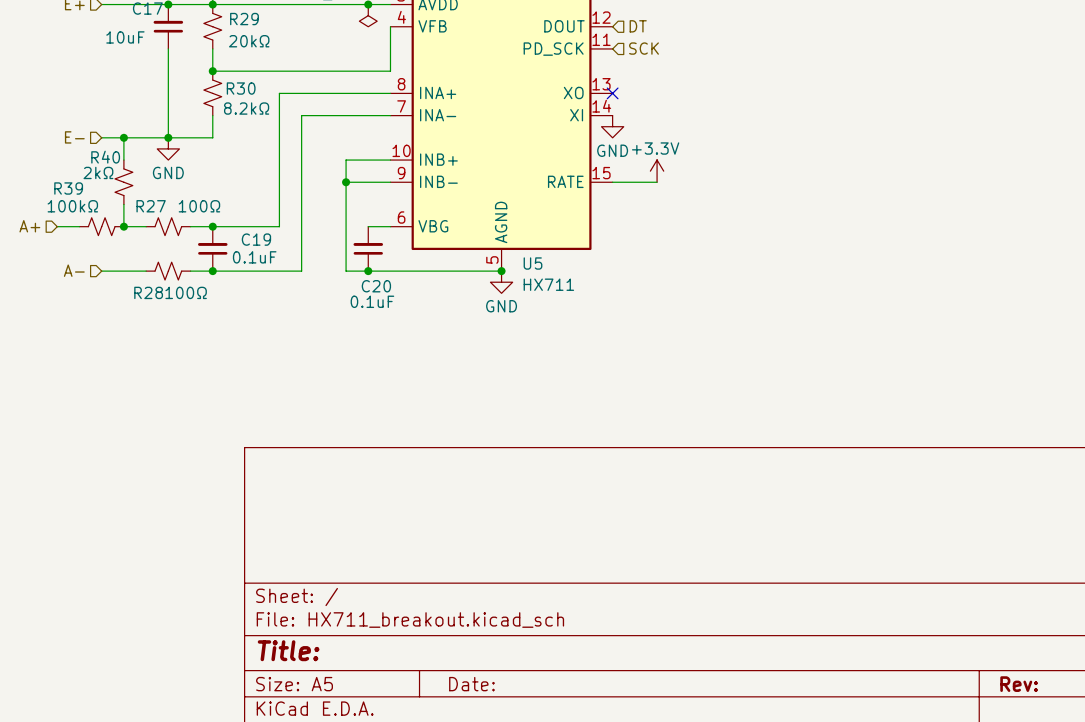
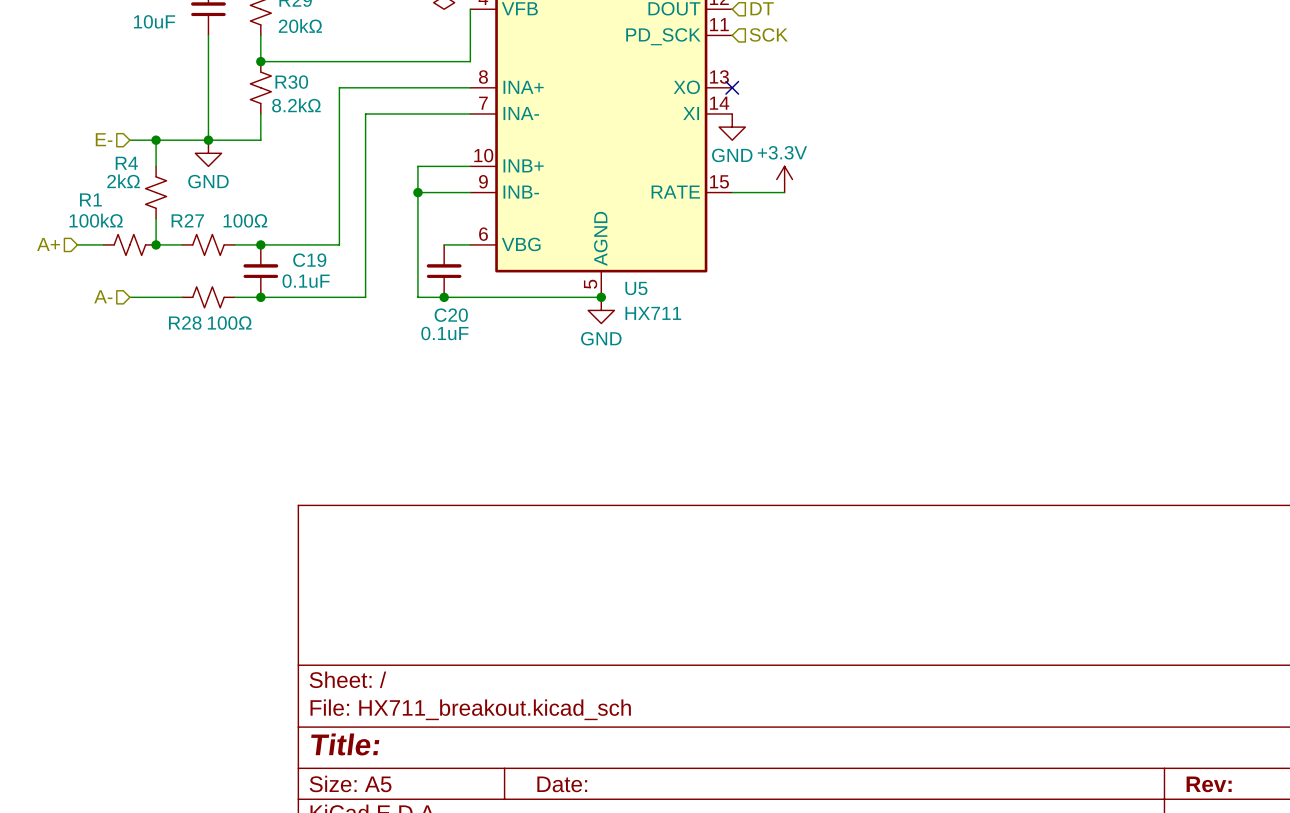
R40 name: R40 (105, 157) -> R4 (126, 163)
R39 name: R39 (68, 188) -> R1 (90, 199)

